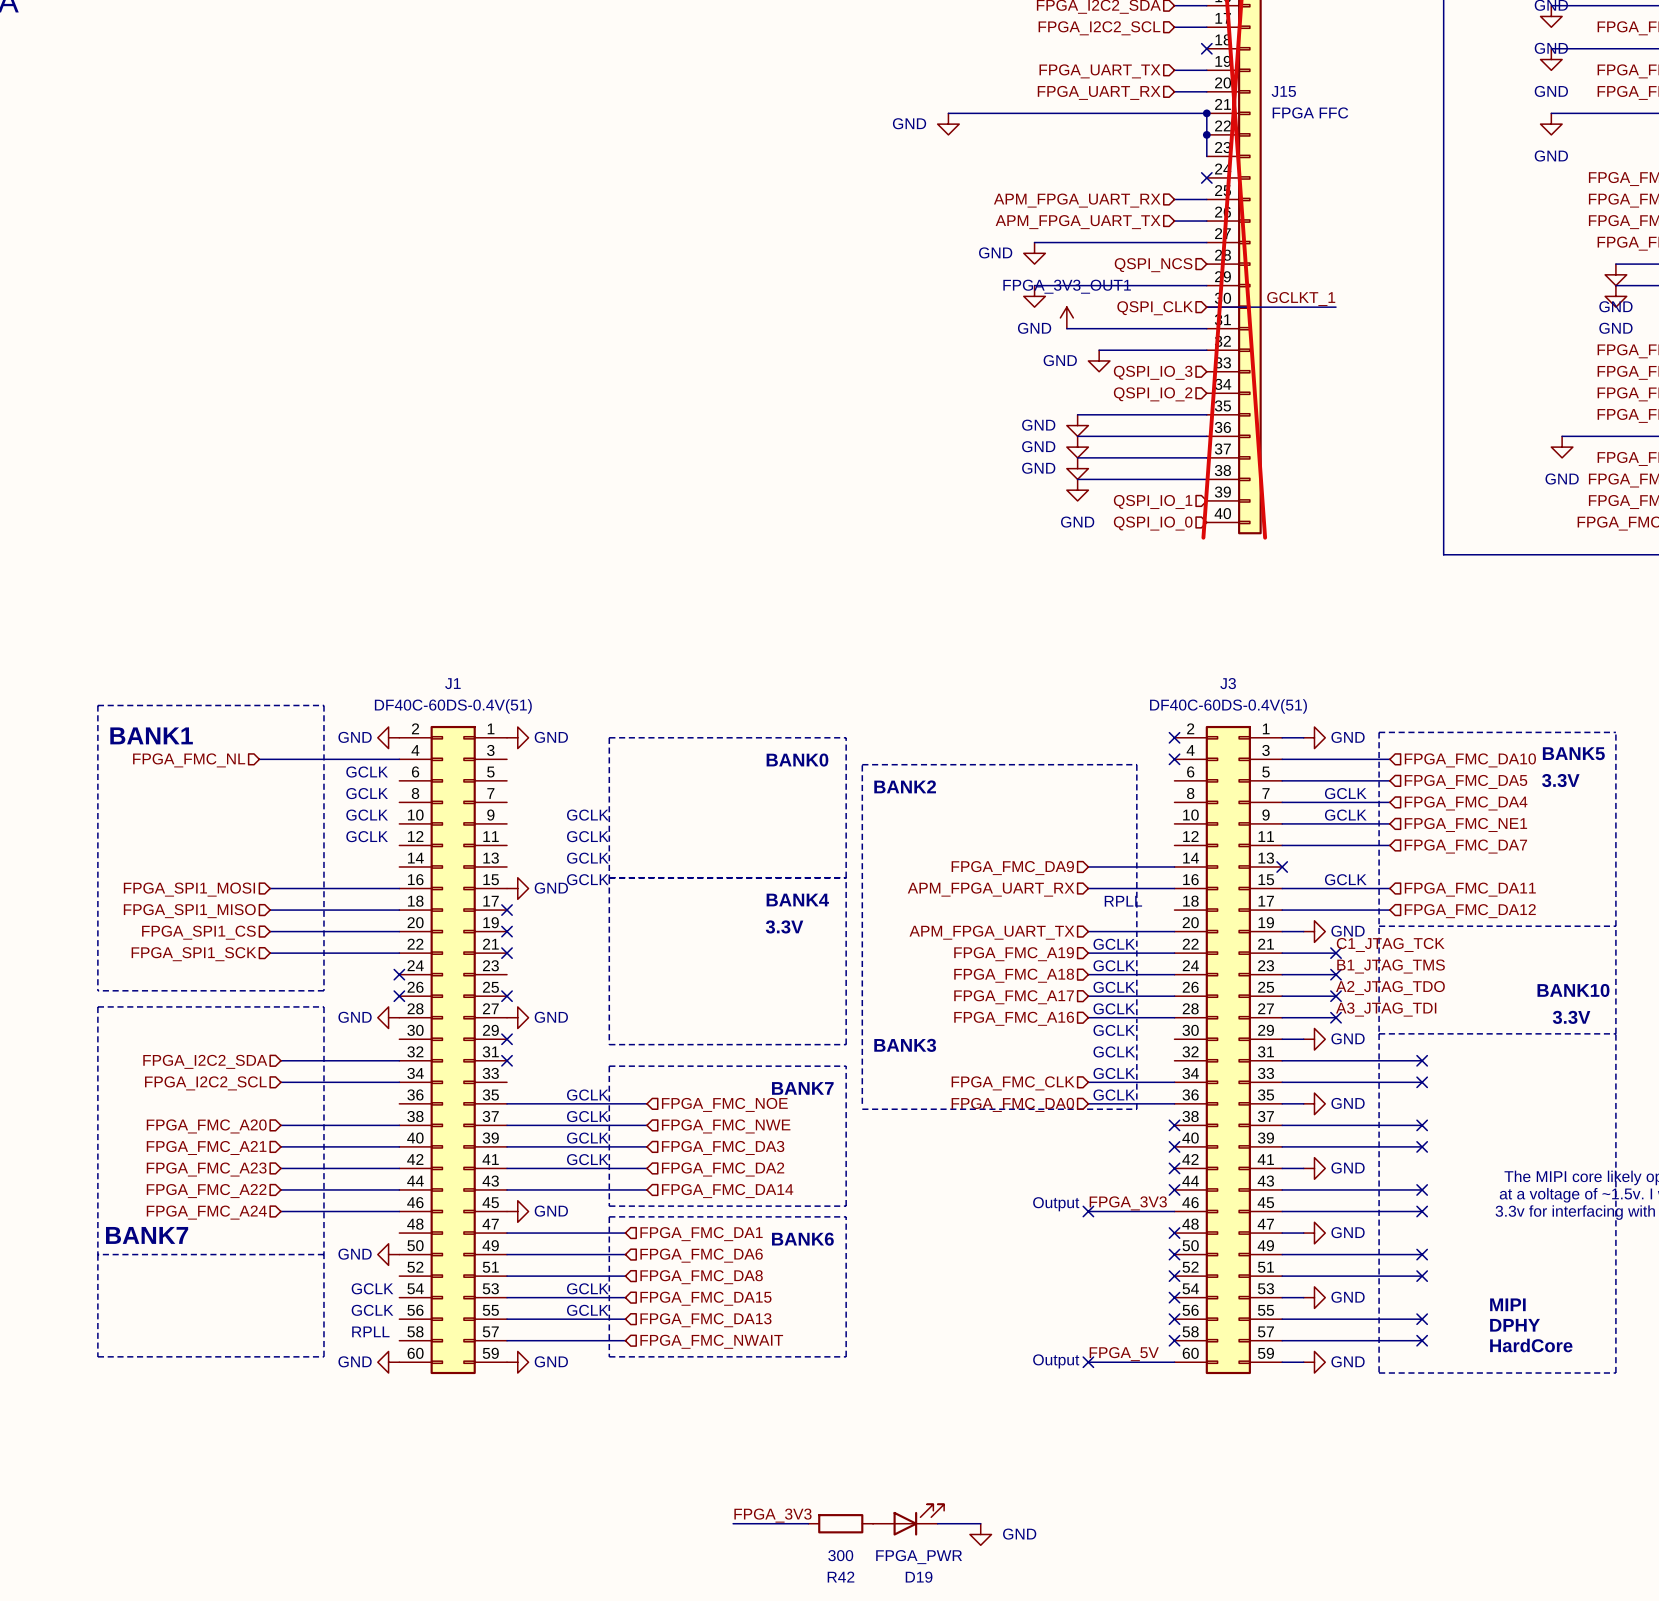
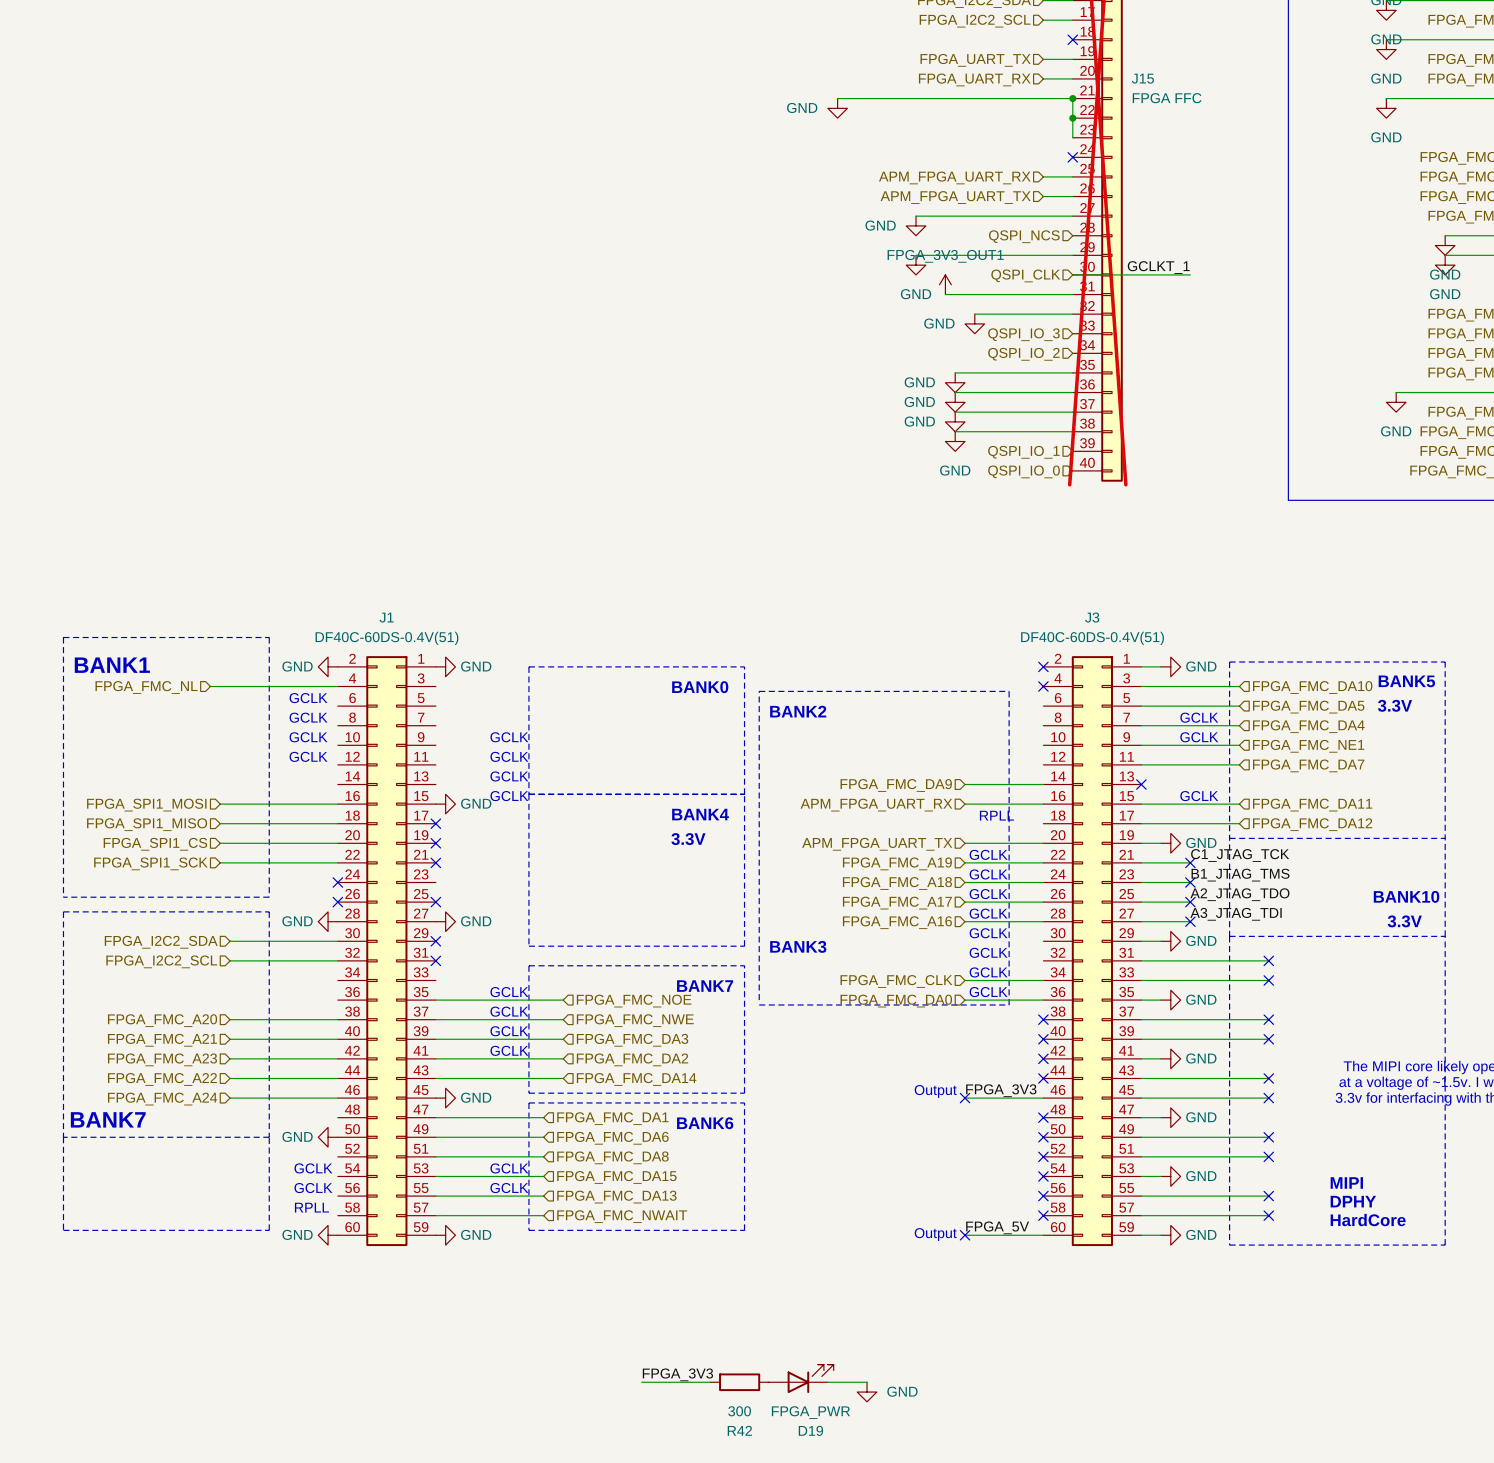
hierarchical label: none -> FPGA_I2C2_SDA (161, 942)
hierarchical label: FPGA_I2C2_SDA (205, 1061) -> FPGA_I2C2_SCL (161, 961)
wire: (280, 1082) (399, 1082) -> (230, 941) (337, 941)
hierarchical label: FPGA_I2C2_SCL (205, 1083) -> none

